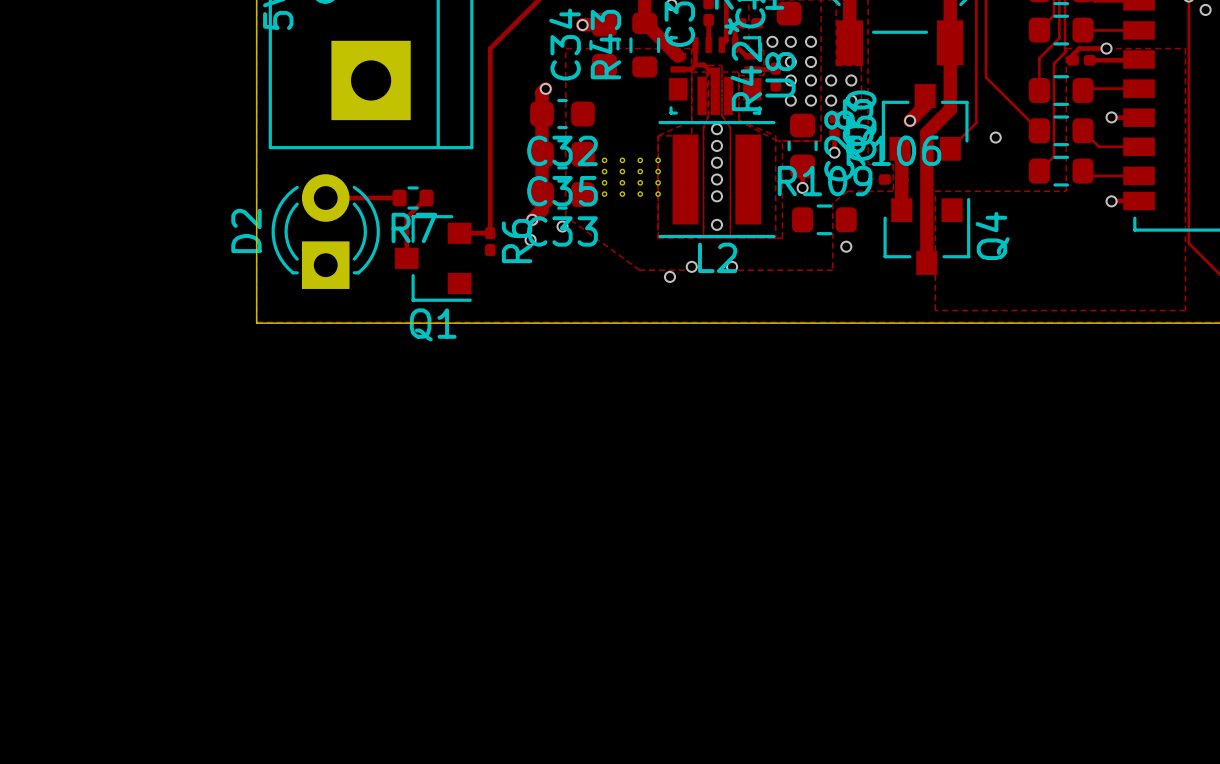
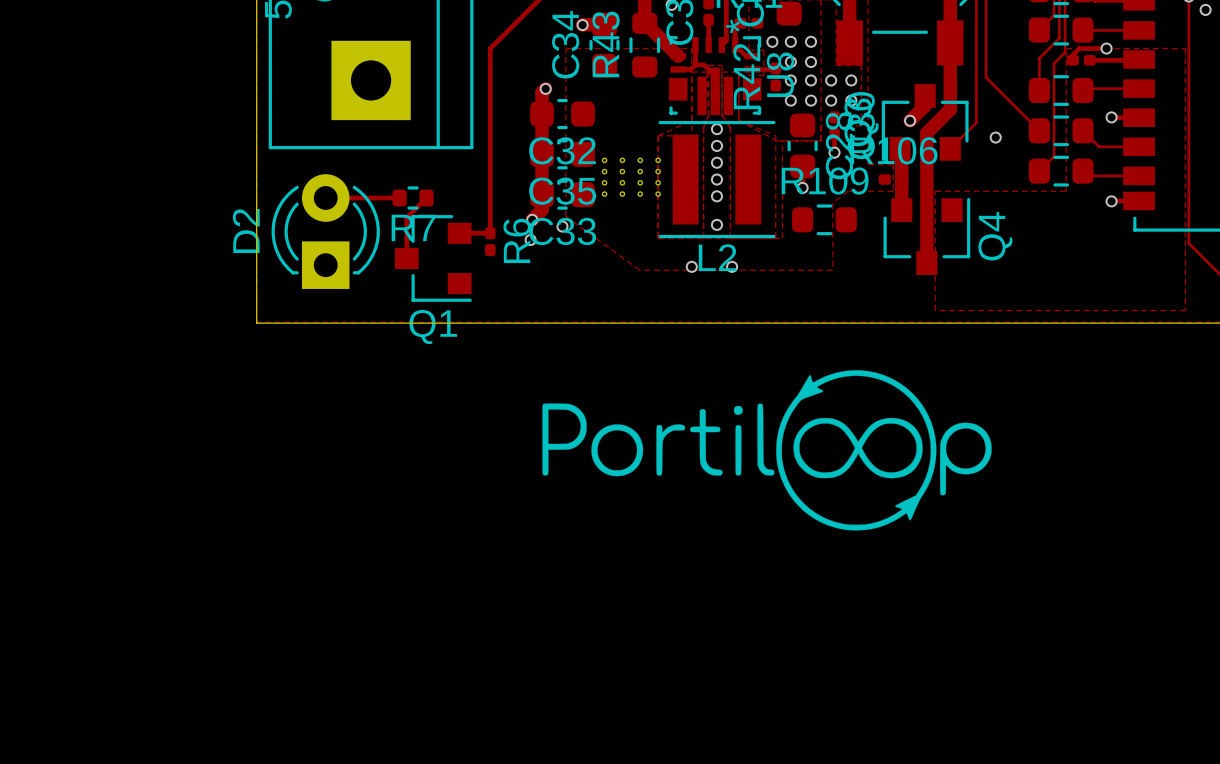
via: (846, 246) -> none
via: (669, 276) -> none
drawing: none -> [542, 370, 992, 531]

